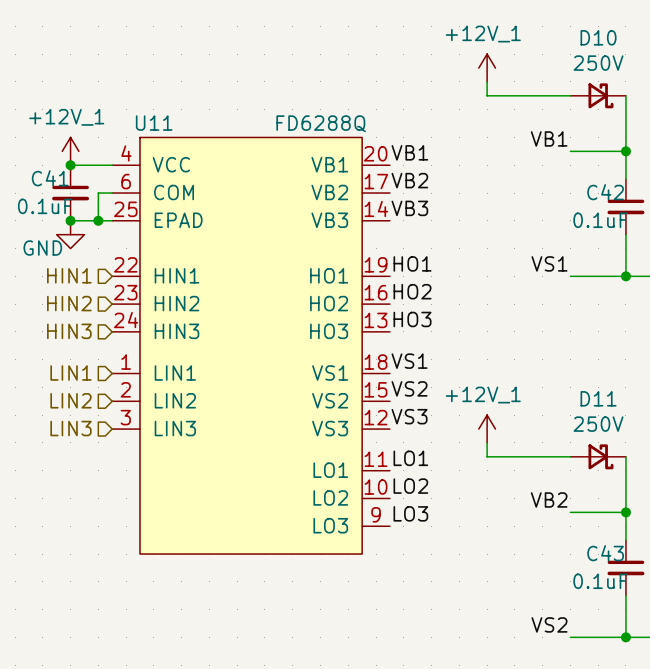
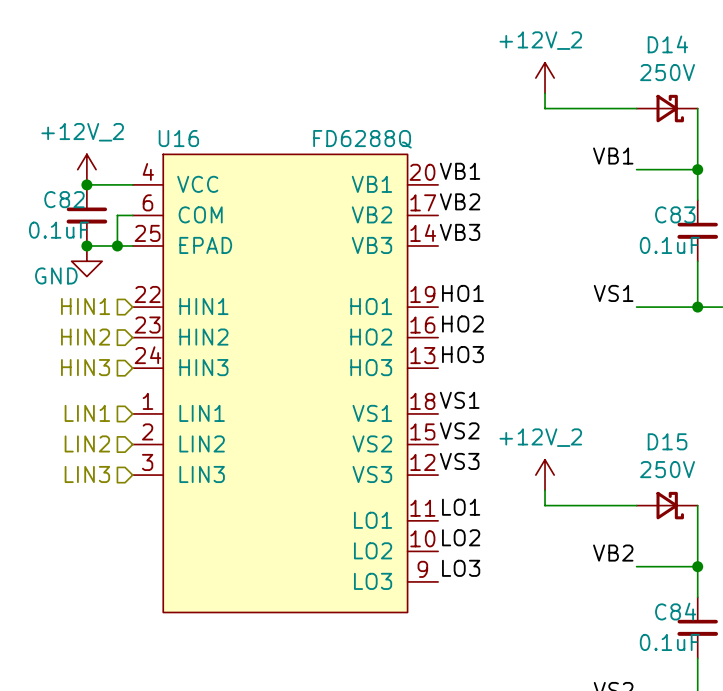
D10 name: D10 (598, 37) -> D14 (667, 44)
power symbol: +12V_1 (487, 68) -> +12V_2 (545, 78)
U11 name: U11 (154, 123) -> U16 (178, 138)
power symbol: +12V_1 (70, 151) -> +12V_2 (86, 169)
C41 name: C41 (50, 178) -> C82 (64, 199)
C42 name: C42 (605, 192) -> C83 (675, 214)
D11 name: D11 (598, 398) -> D15 (667, 441)
power symbol: +12V_1 (487, 429) -> +12V_2 (545, 475)
C43 name: C43 (605, 553) -> C84 (675, 611)

